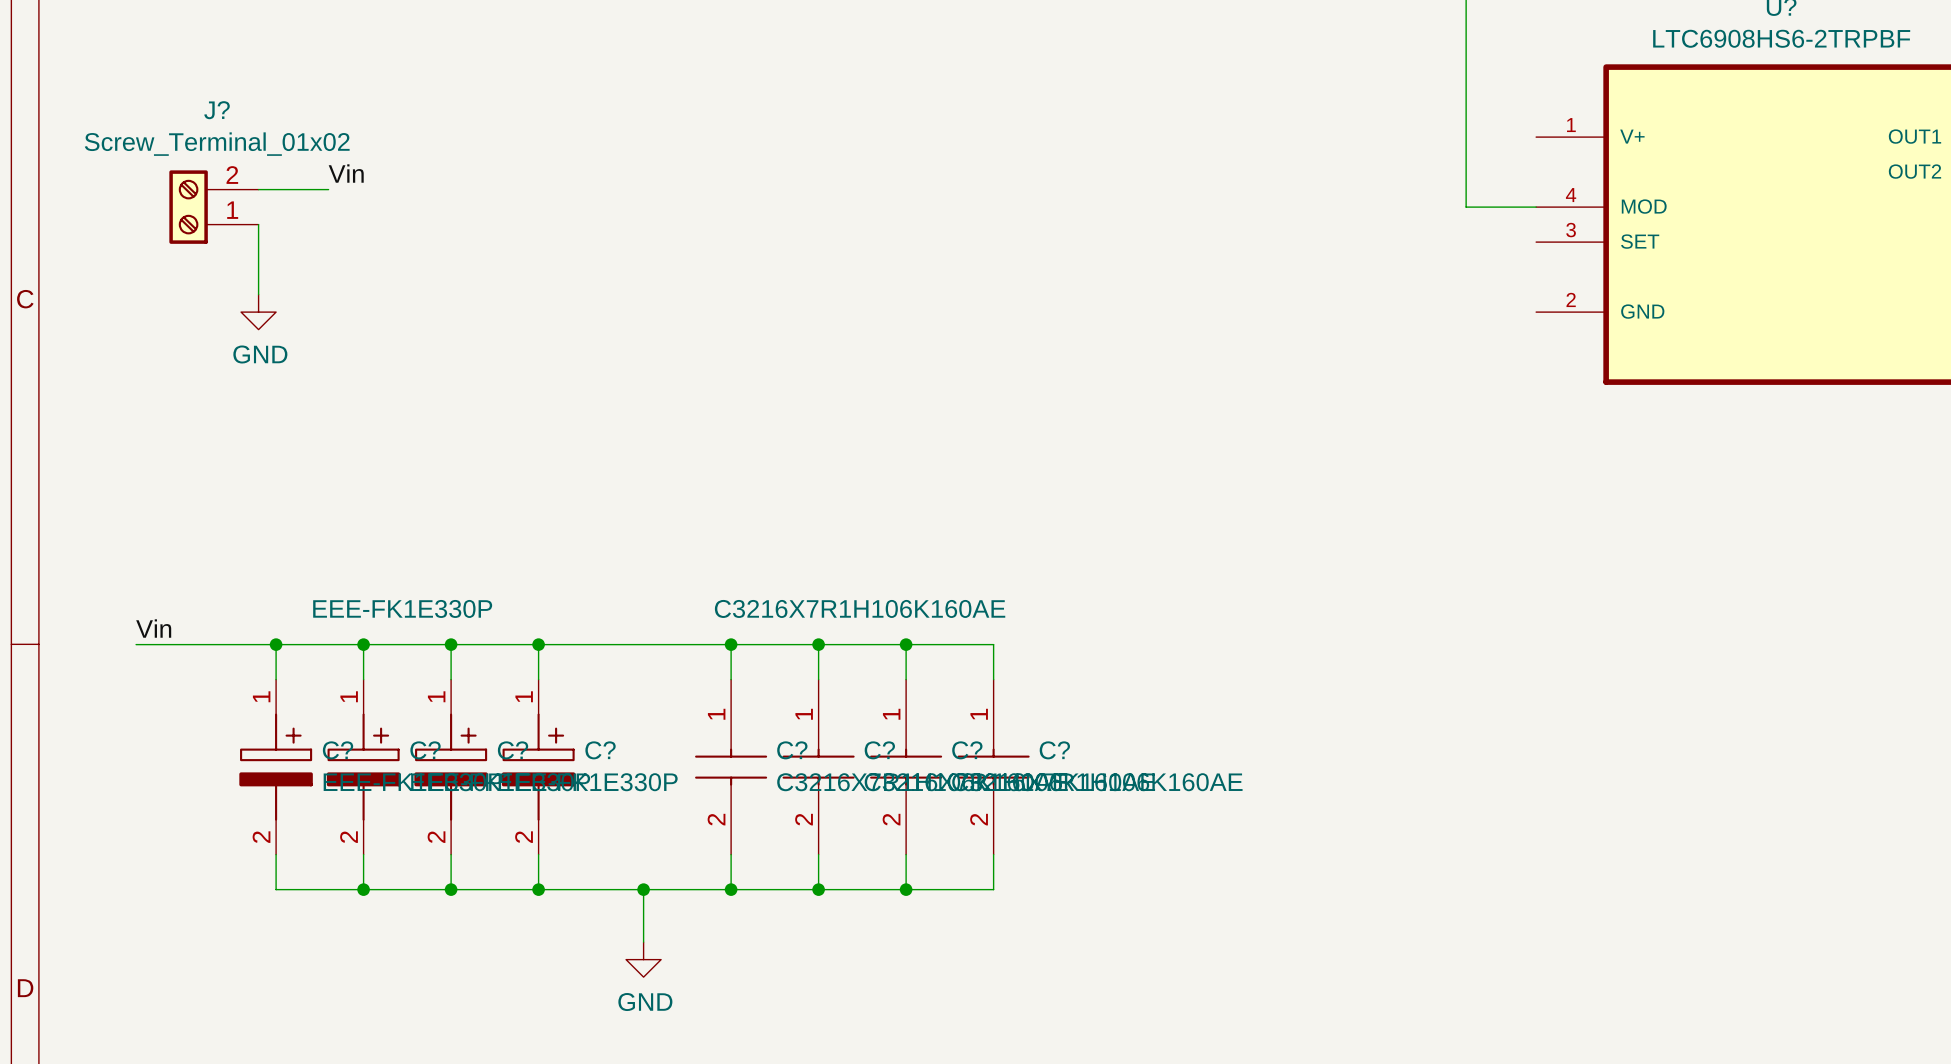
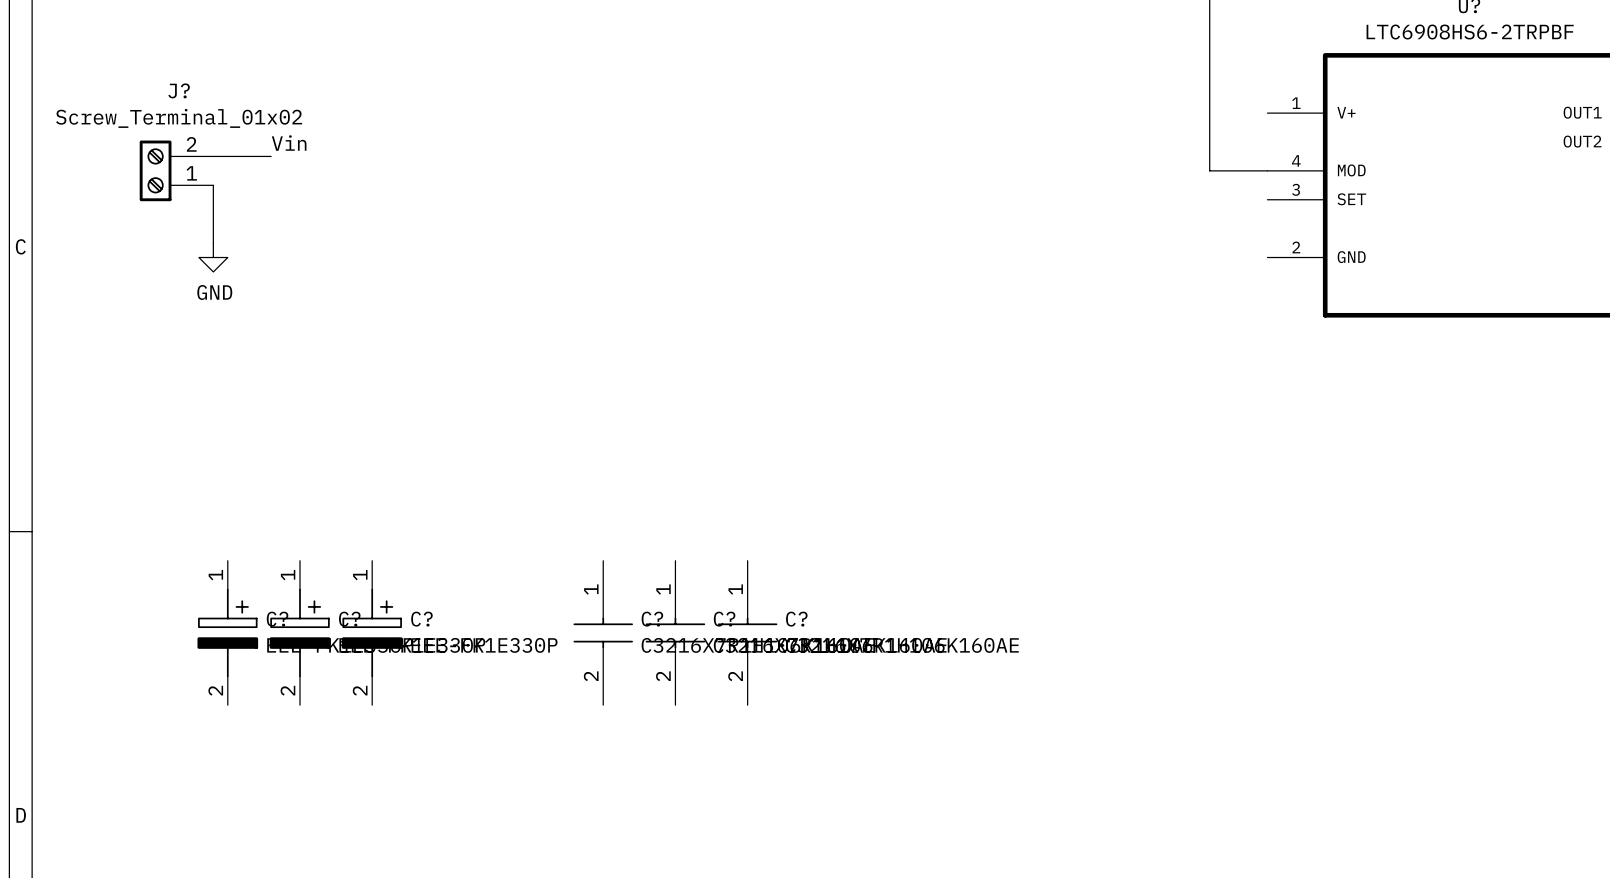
label: Vin (153, 628) -> none
wire: (136, 644) (993, 644) (993, 679) -> none
wire: (276, 644) (276, 679) -> none
junction: (276, 644) -> none
wire: (363, 644) (363, 679) -> none
junction: (363, 644) -> none
wire: (451, 644) (451, 679) -> none
junction: (451, 644) -> none
wire: (538, 644) (538, 679) -> none
junction: (538, 644) -> none
wire: (731, 644) (731, 679) -> none
junction: (731, 644) -> none
wire: (818, 644) (818, 679) -> none
junction: (818, 644) -> none
wire: (906, 644) (906, 679) -> none
junction: (906, 644) -> none
C?: EEE-FK1E330P (538, 767) -> none
C?: C3216X7R1H106K160AE (993, 767) -> none
wire: (276, 854) (276, 889) (993, 889) (993, 854) -> none
wire: (363, 854) (363, 889) -> none
wire: (451, 854) (451, 889) -> none
wire: (538, 854) (538, 889) -> none
wire: (731, 854) (731, 889) -> none
wire: (818, 854) (818, 889) -> none
wire: (906, 854) (906, 889) -> none
junction: (363, 889) -> none
junction: (451, 889) -> none
junction: (538, 889) -> none
wire: (643, 889) (643, 942) -> none
junction: (643, 889) -> none
junction: (731, 889) -> none
junction: (818, 889) -> none
junction: (906, 889) -> none
power symbol: GND (643, 959) -> none

